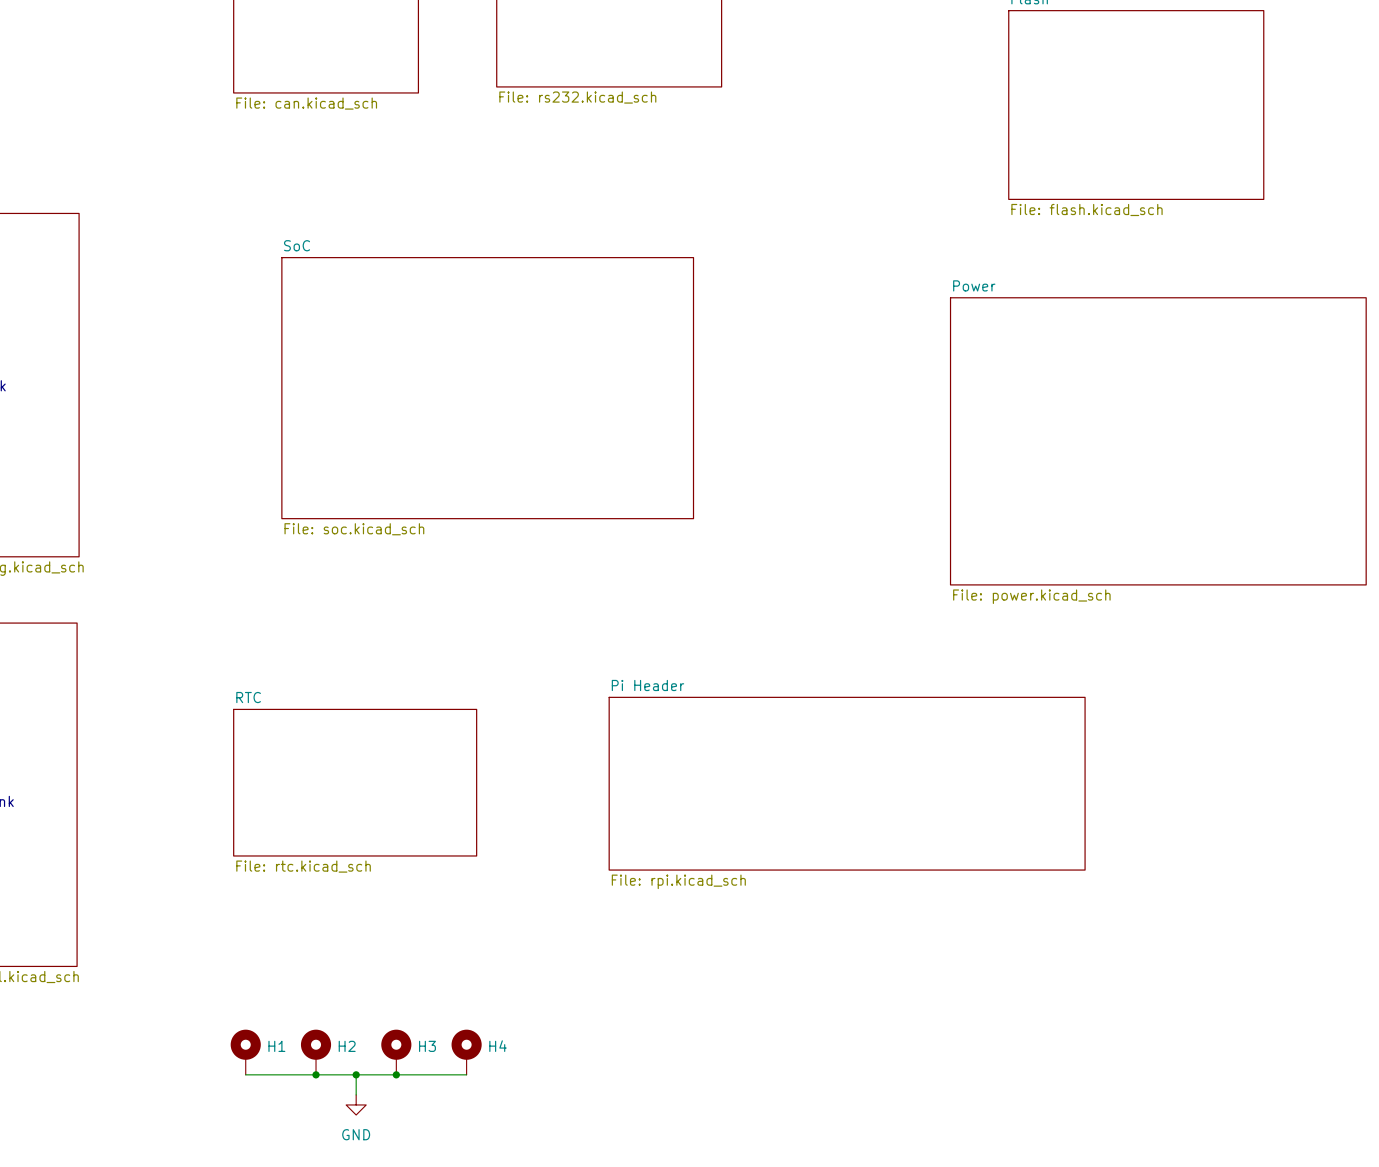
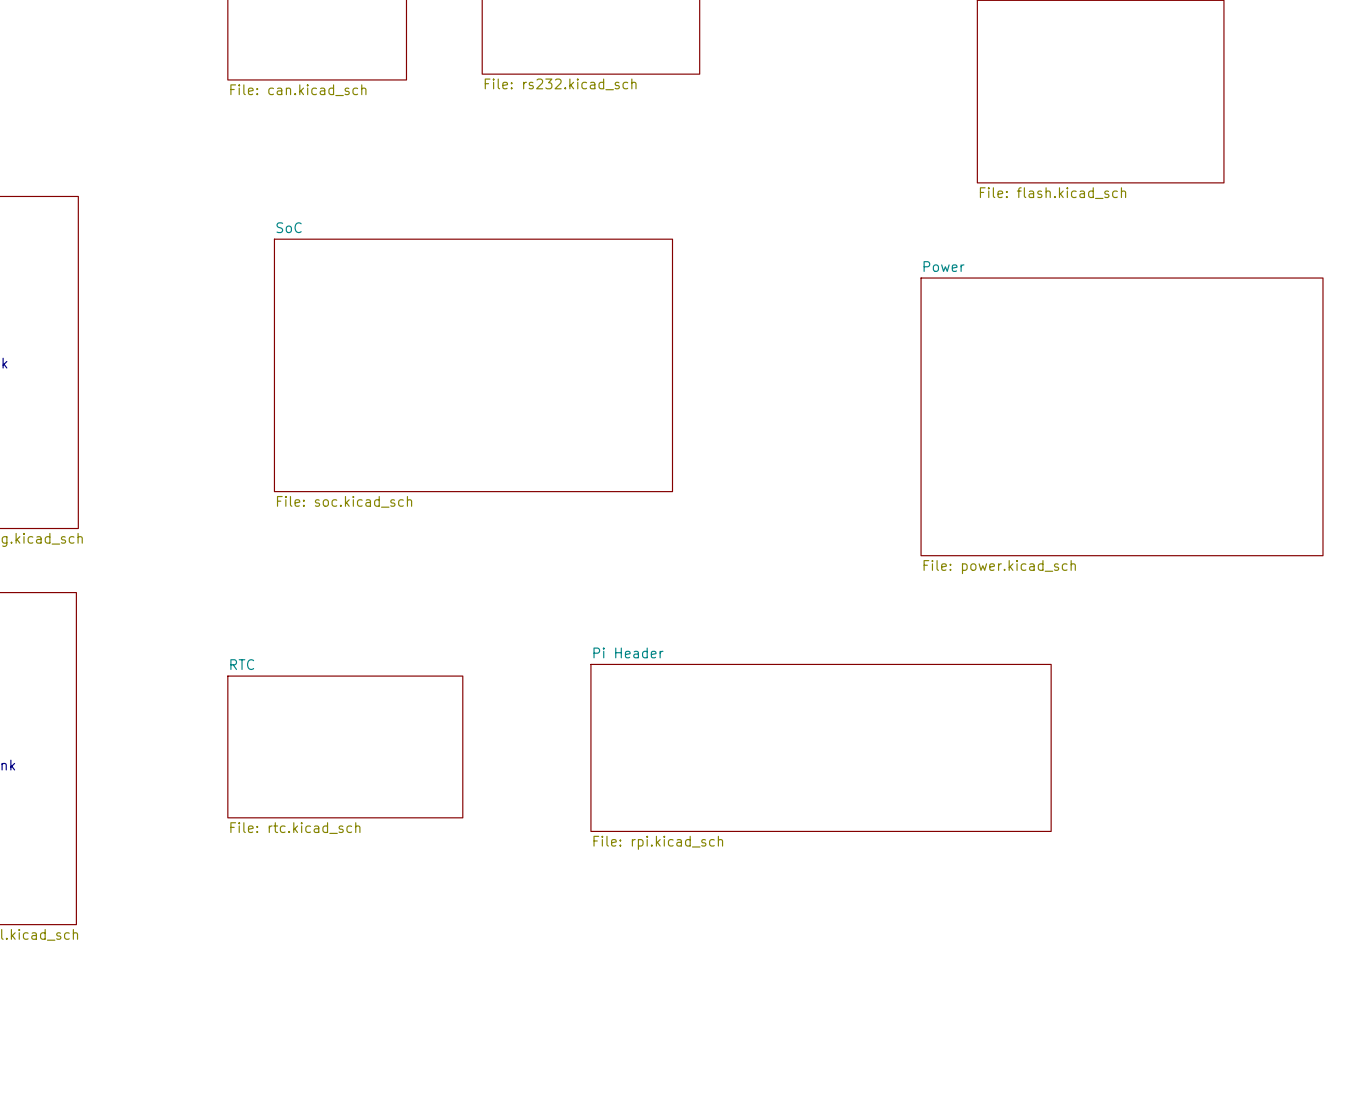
H1: (245, 1052) -> none
H2: (316, 1052) -> none
H3: (396, 1052) -> none
H4: (466, 1052) -> none
wire: (245, 1074) (466, 1074) -> none
junction: (316, 1074) -> none
wire: (356, 1074) (356, 1094) -> none
junction: (356, 1074) -> none
junction: (396, 1074) -> none
power symbol: GND (356, 1104) -> none

